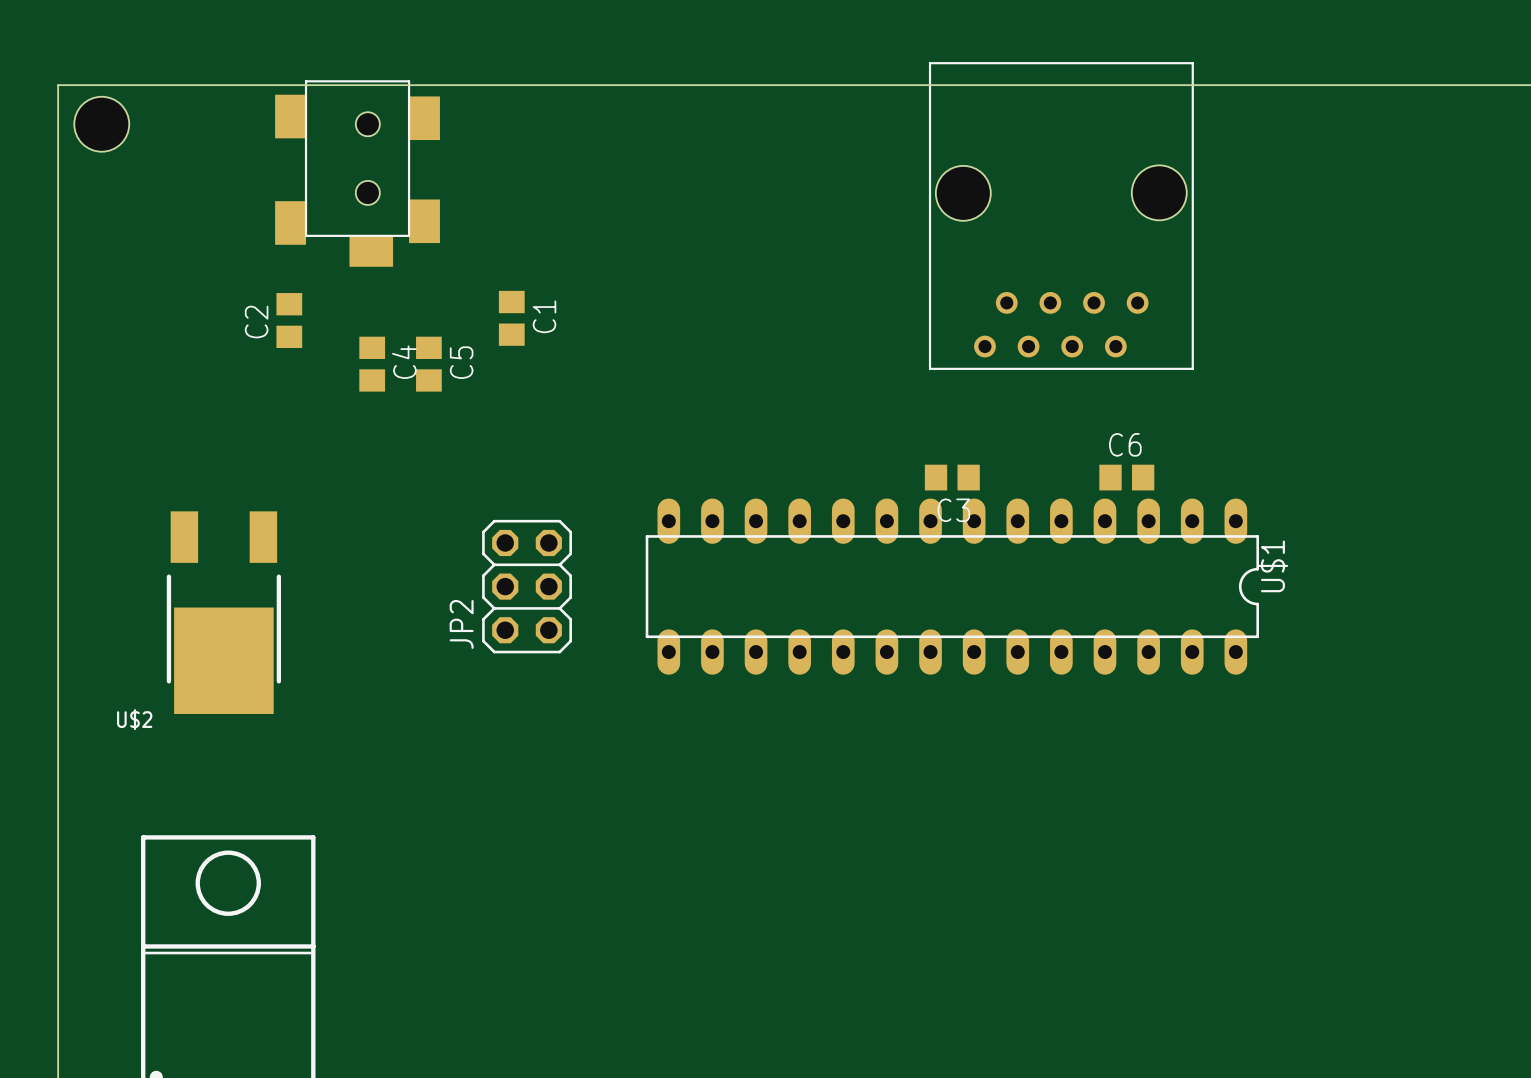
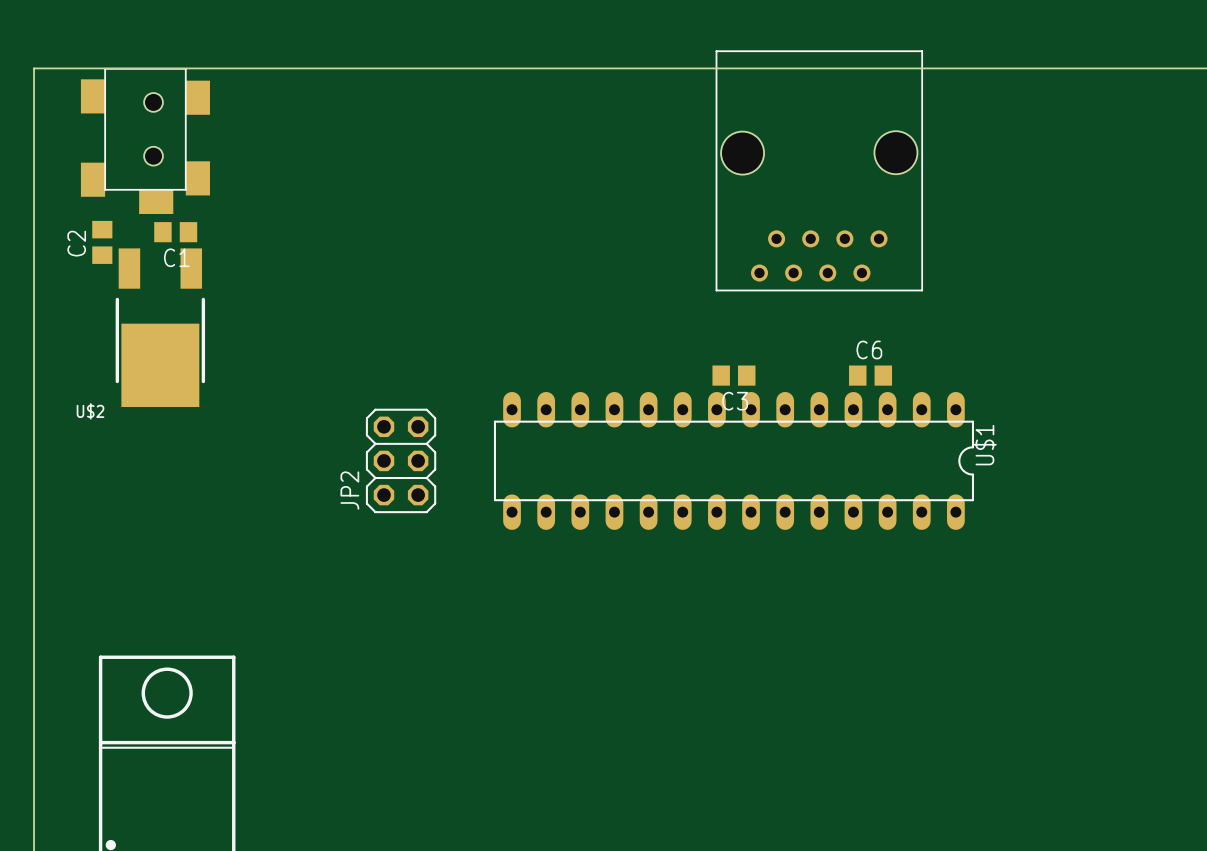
hole: (101, 124) -> none
part position: (357, 173) -> (145, 140)
C1 rotation: 0° (511, 318) -> 90° clockwise (175, 232)
C1 position: (511, 318) -> (175, 232)
C2 position: (289, 320) -> (102, 242)
C4: (372, 364) -> none
C5: (428, 364) -> none
U$2 position: (223, 612) -> (160, 327)

